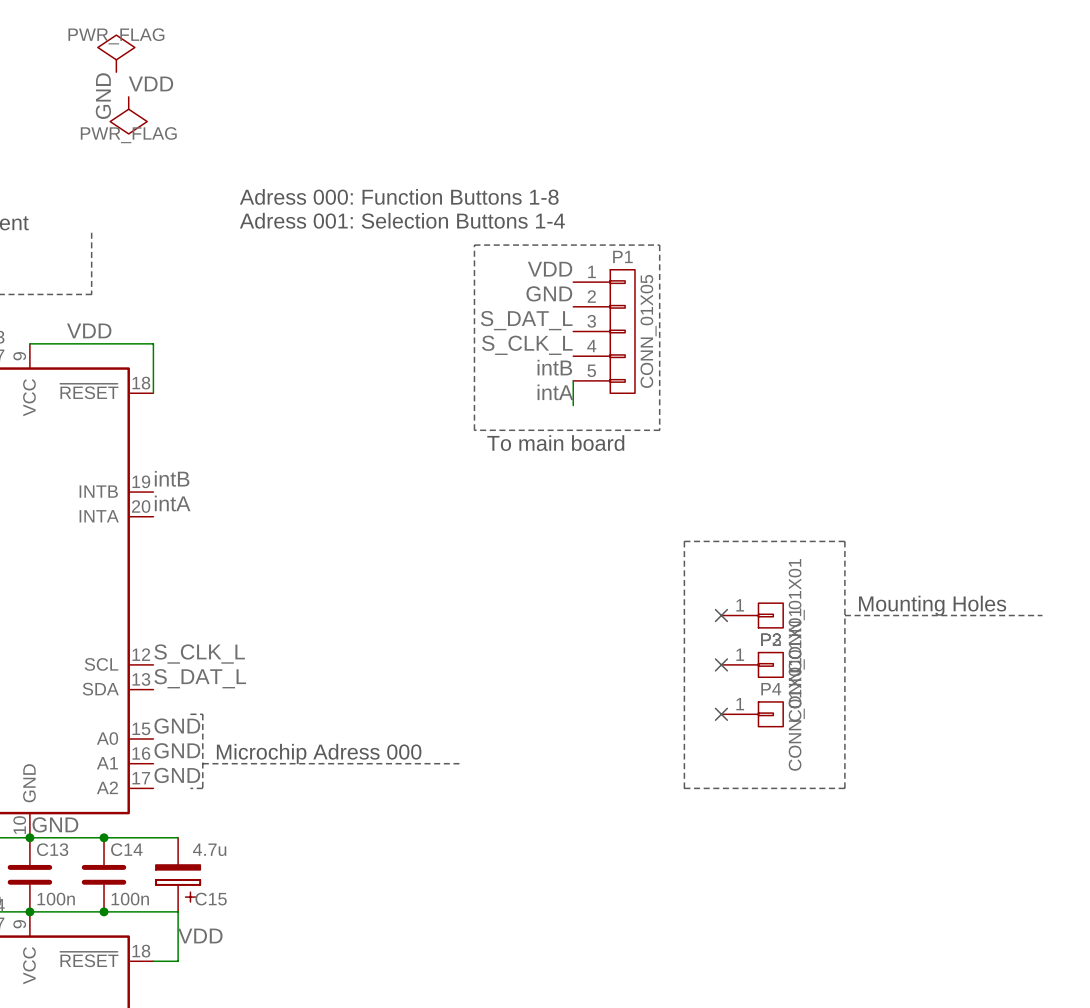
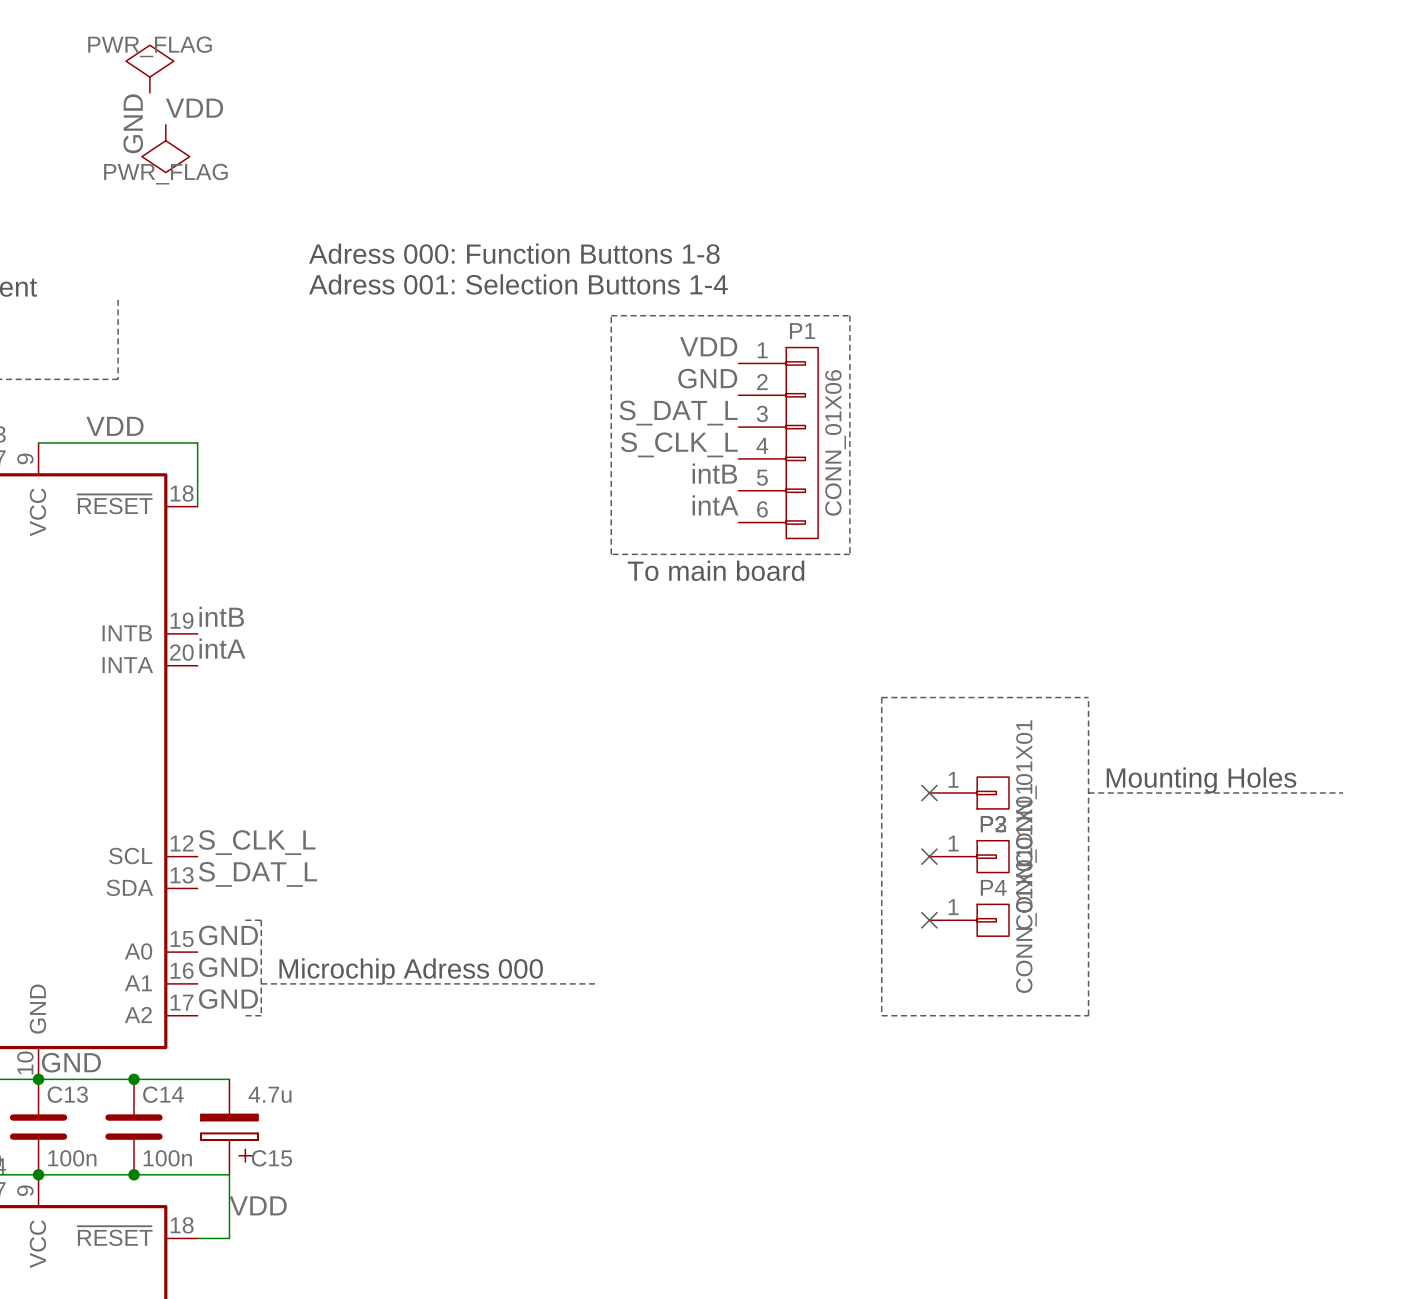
P1 symbol: [573, 269, 635, 394] -> [738, 347, 819, 539]
P1 value: CONN_01X05 (648, 331) -> CONN_01X06 (835, 442)
wire: (573, 380) (573, 405) -> none

